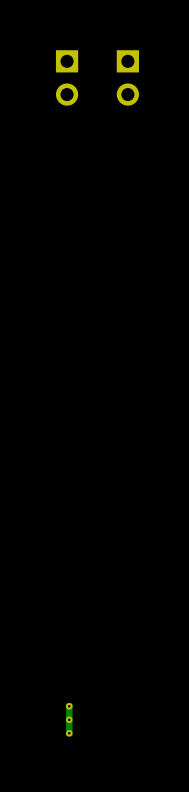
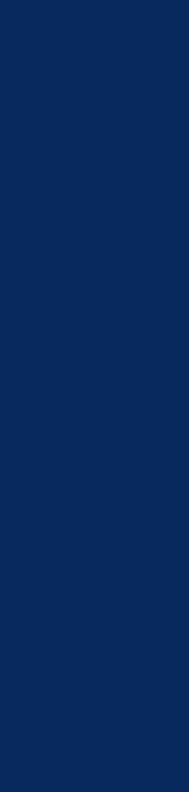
part: (67, 77) -> none
part: (127, 77) -> none
part: (69, 719) -> none

